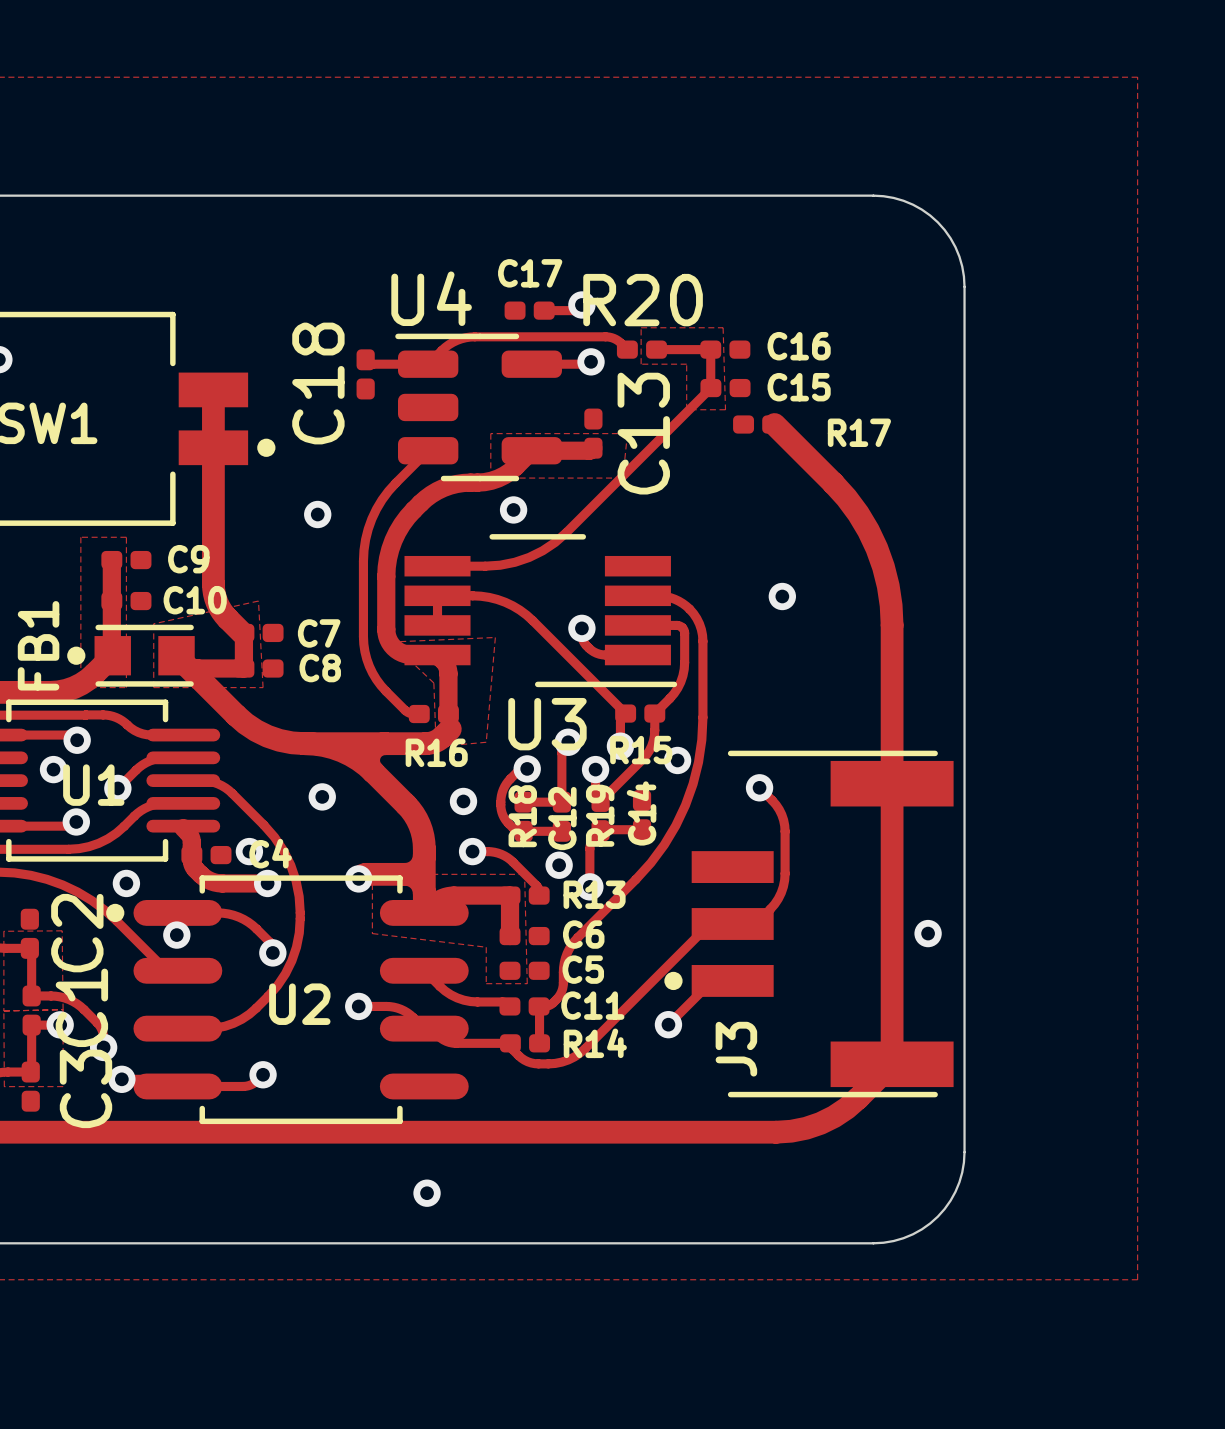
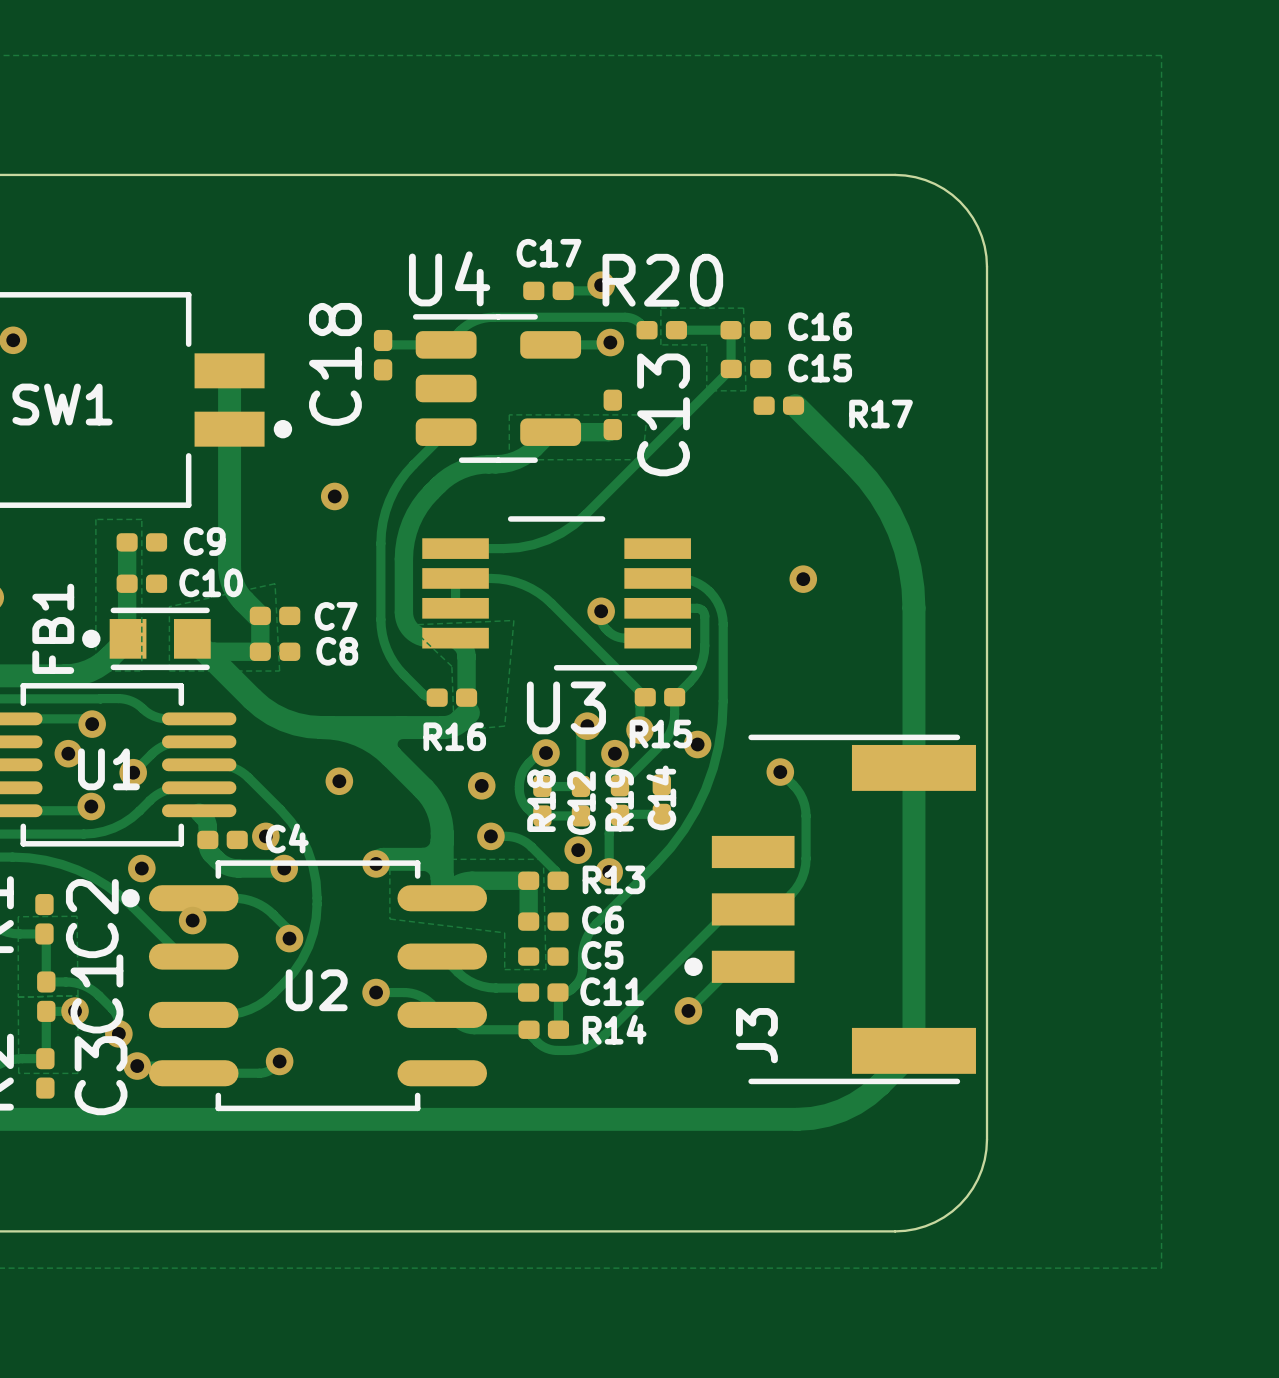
via: (513, 509) -> none
via: (928, 933) -> none
via: (427, 1193) -> none

